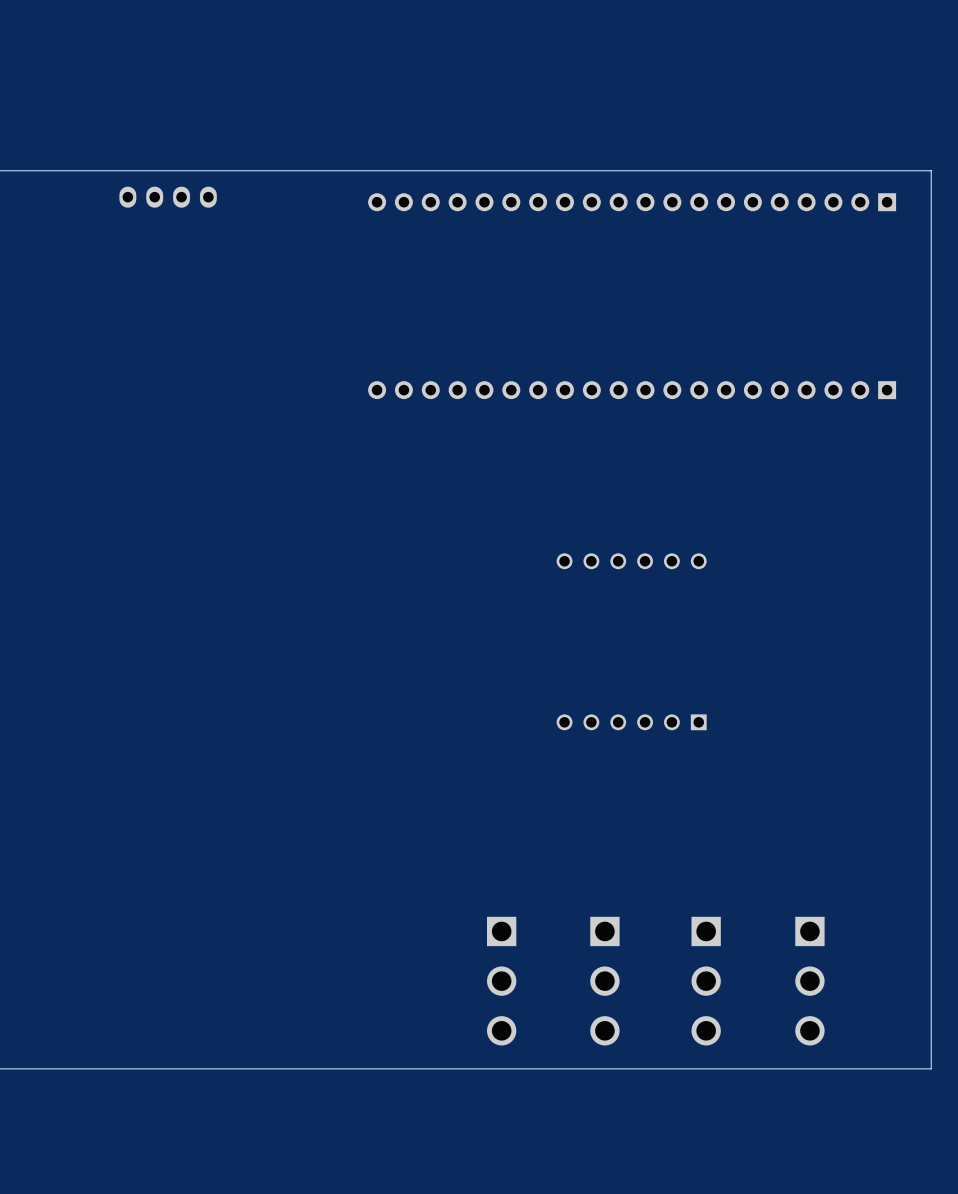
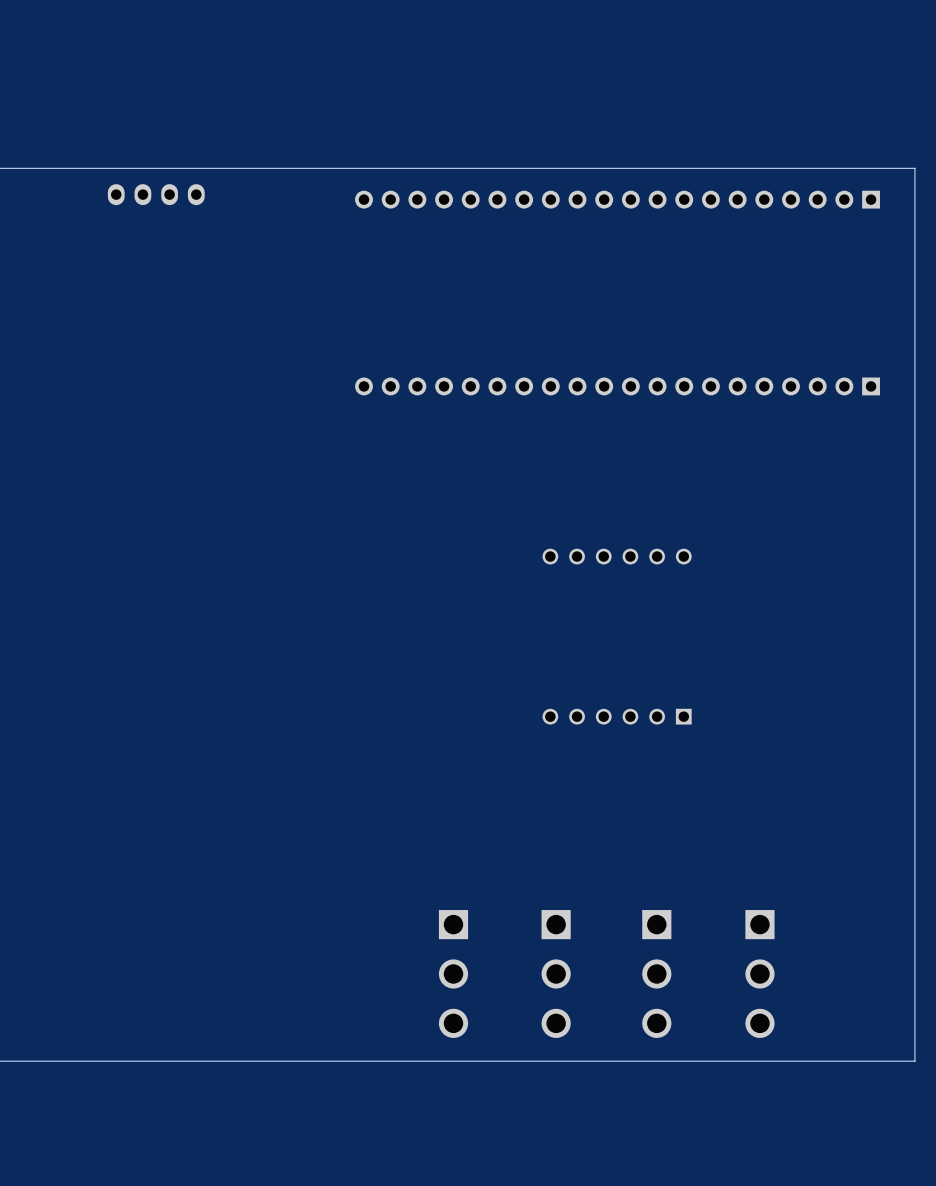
part: none -> (453, 973)
part: (501, 981) -> none
part: none -> (556, 973)
part: (604, 981) -> none
part: none -> (656, 973)
part: (706, 981) -> none
part: none -> (759, 973)
part: (809, 981) -> none

